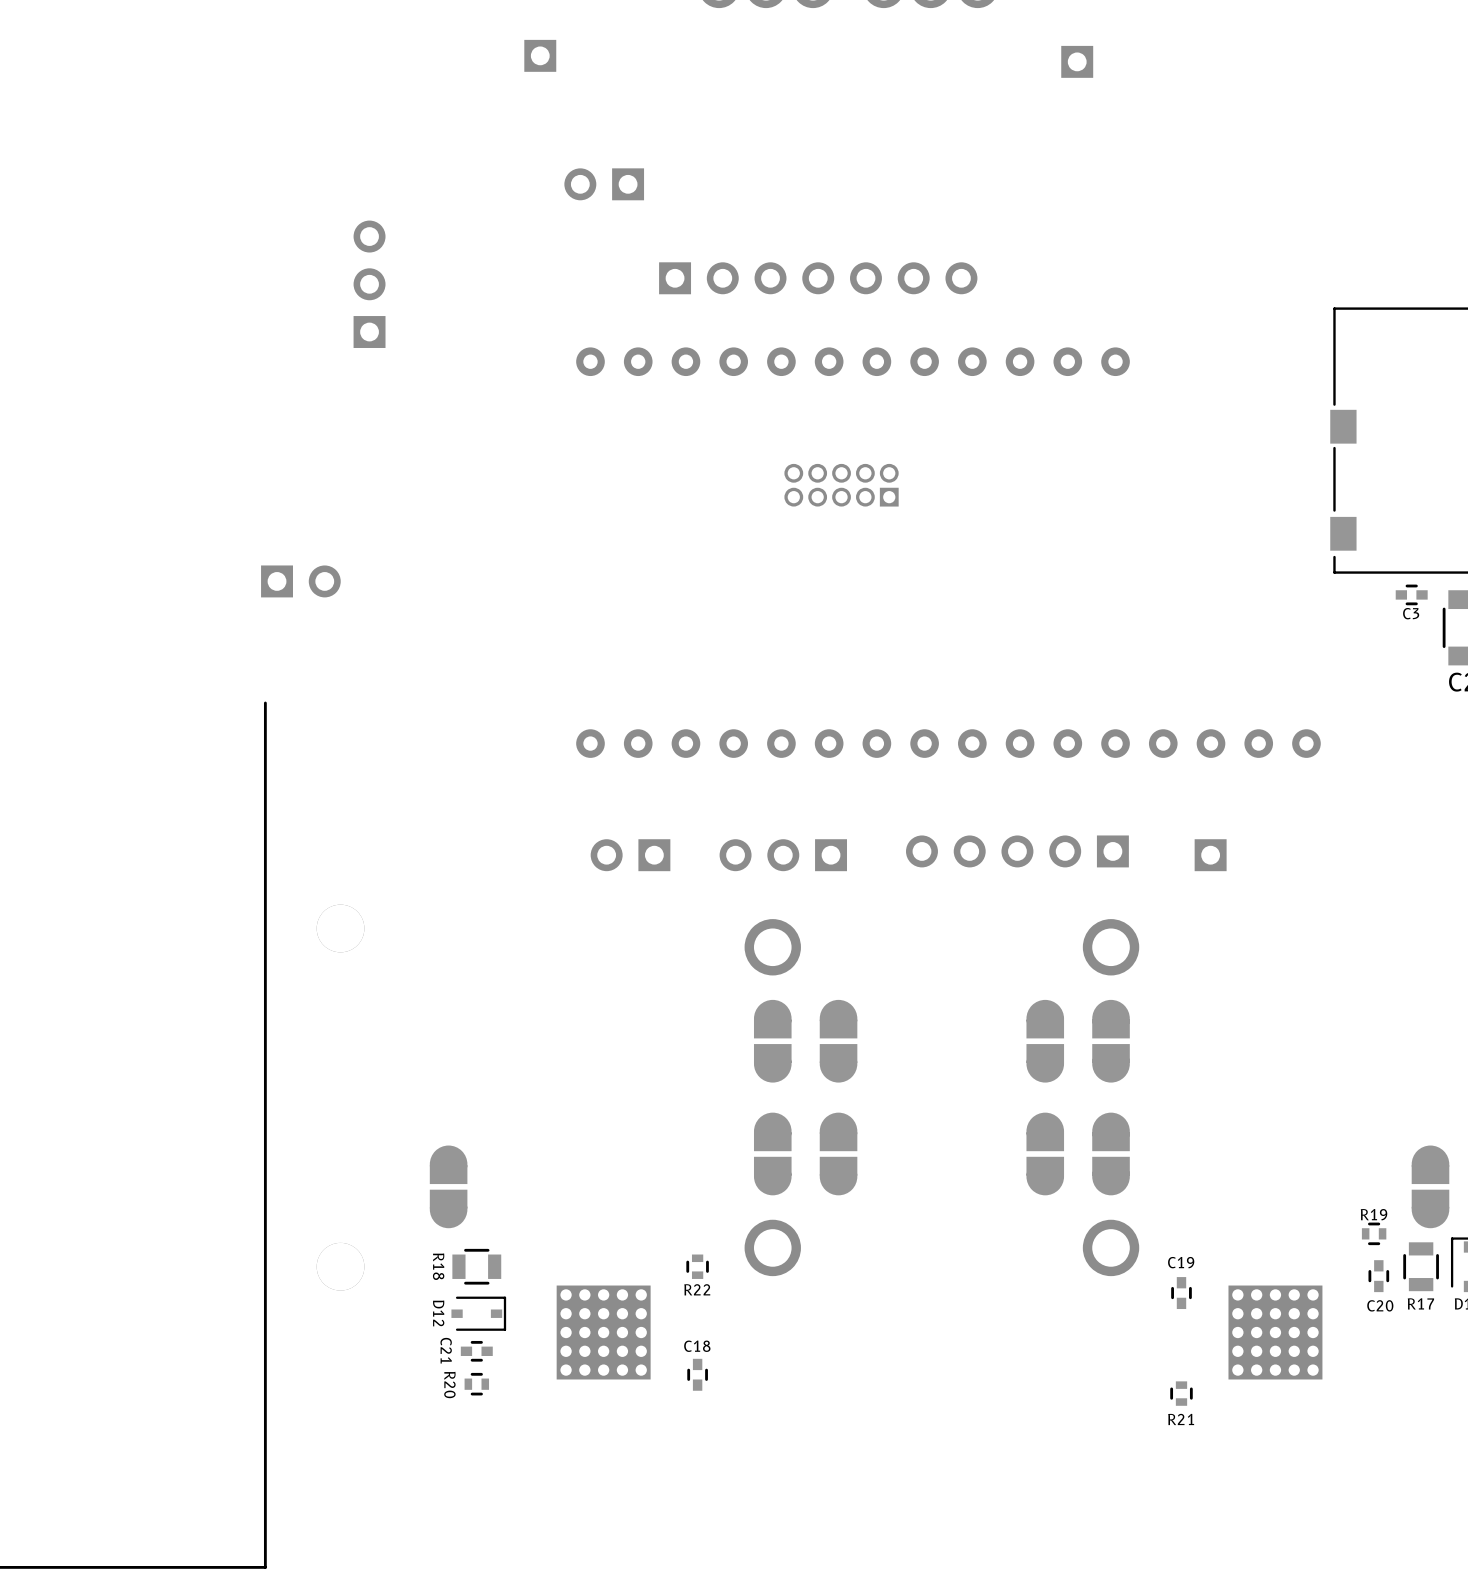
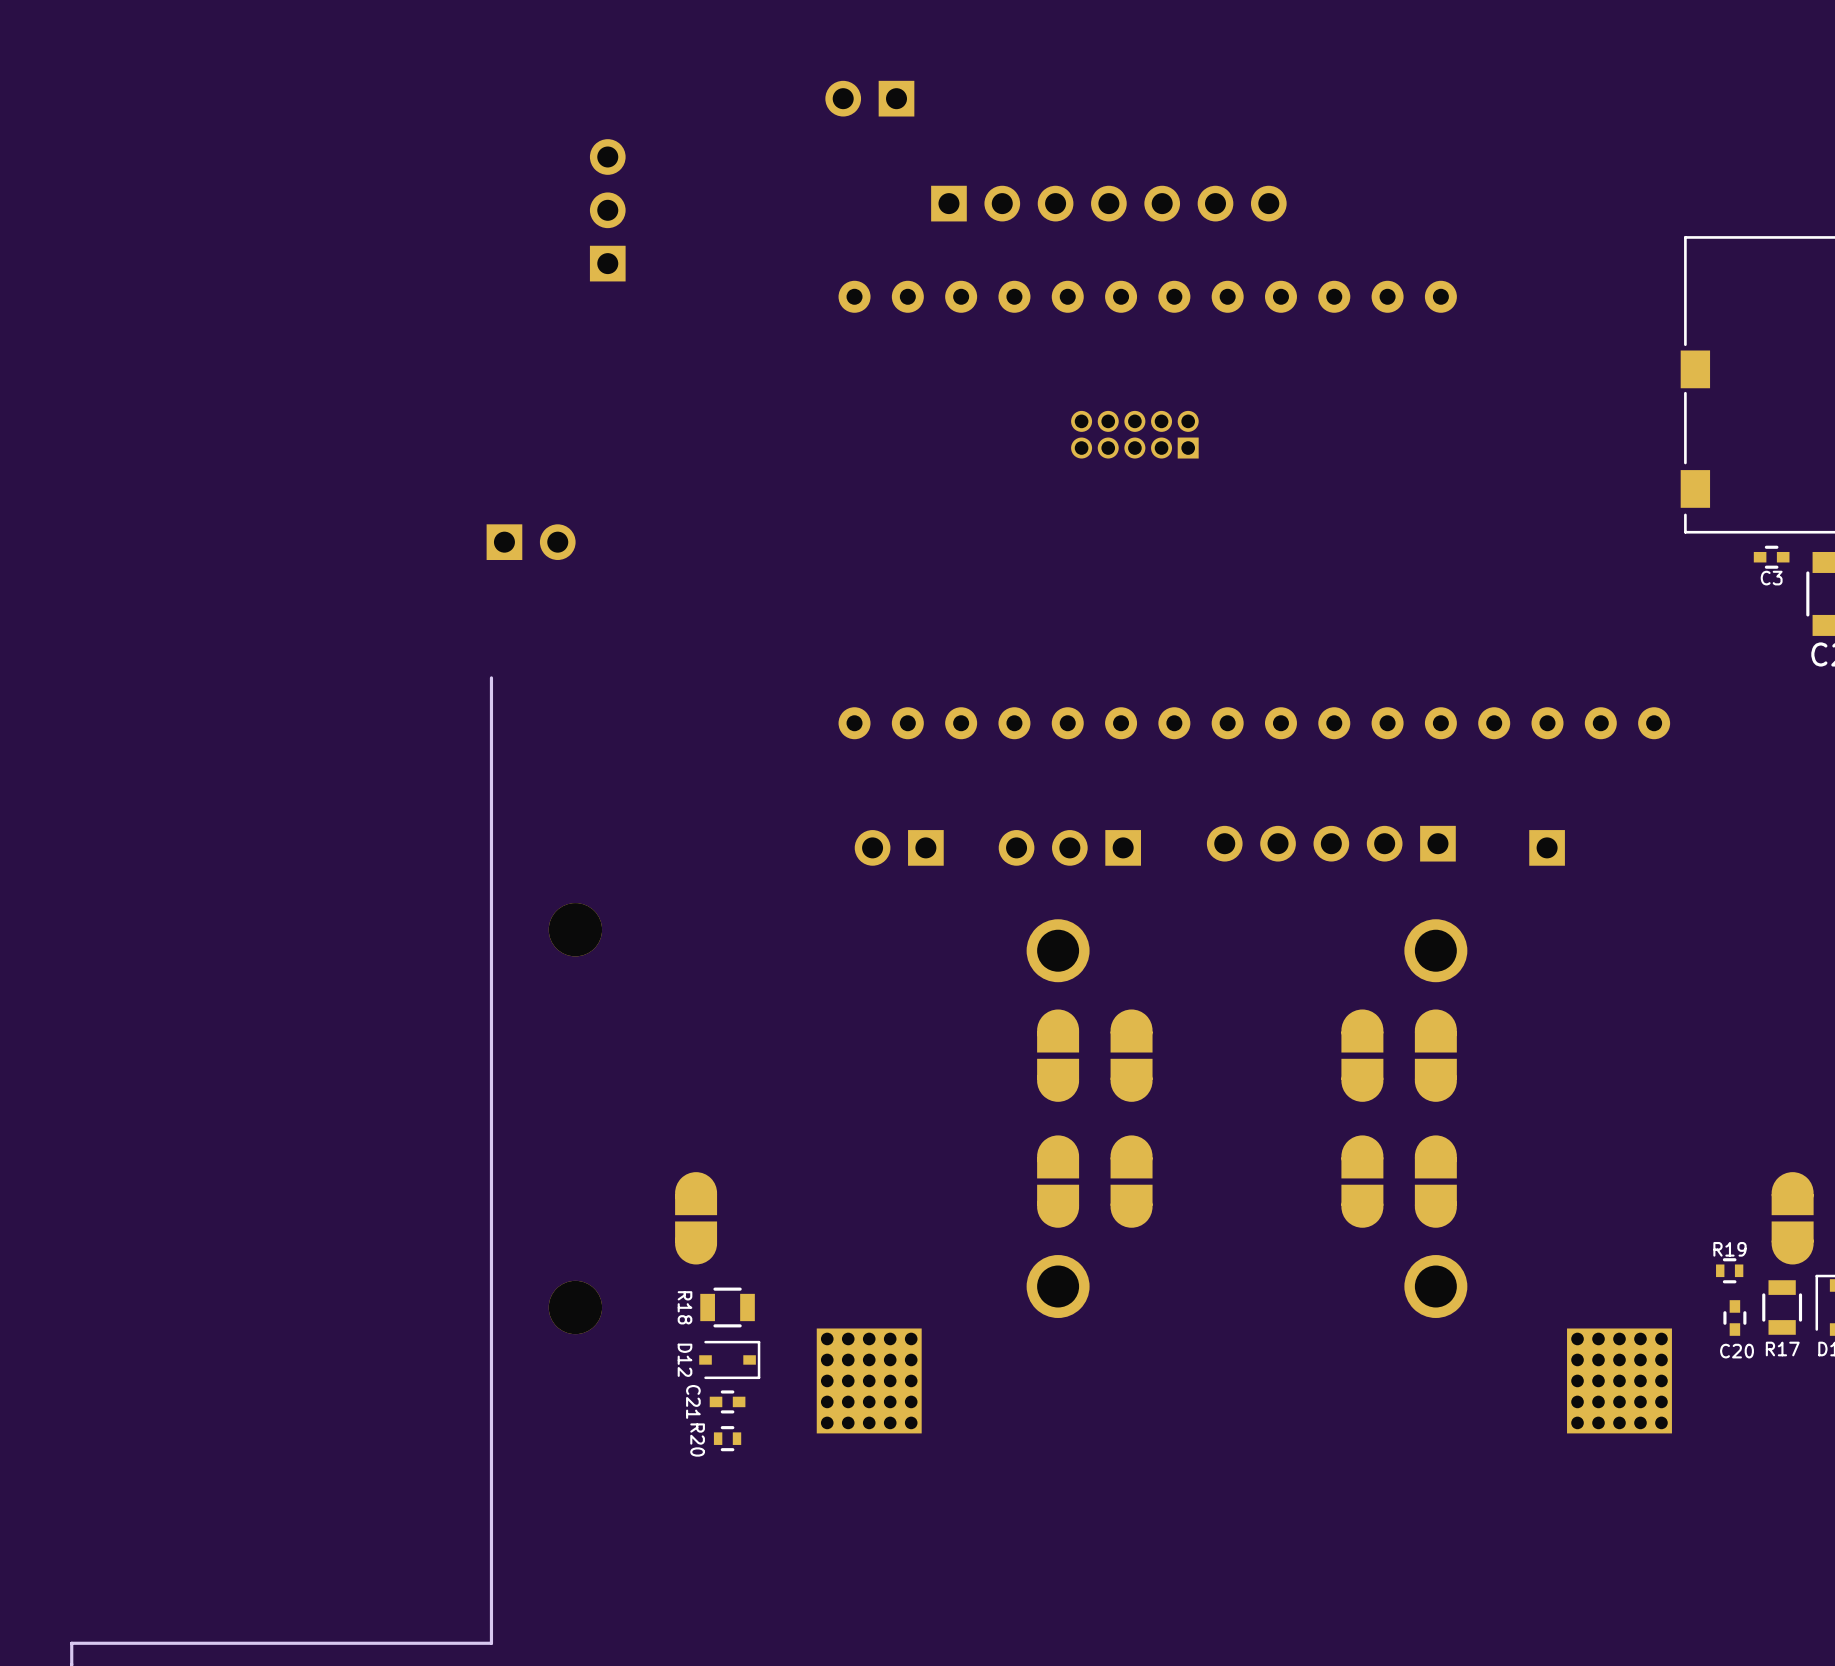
R22: (697, 1266) -> none
C19: (1181, 1293) -> none
C18: (697, 1374) -> none
R21: (1181, 1393) -> none

